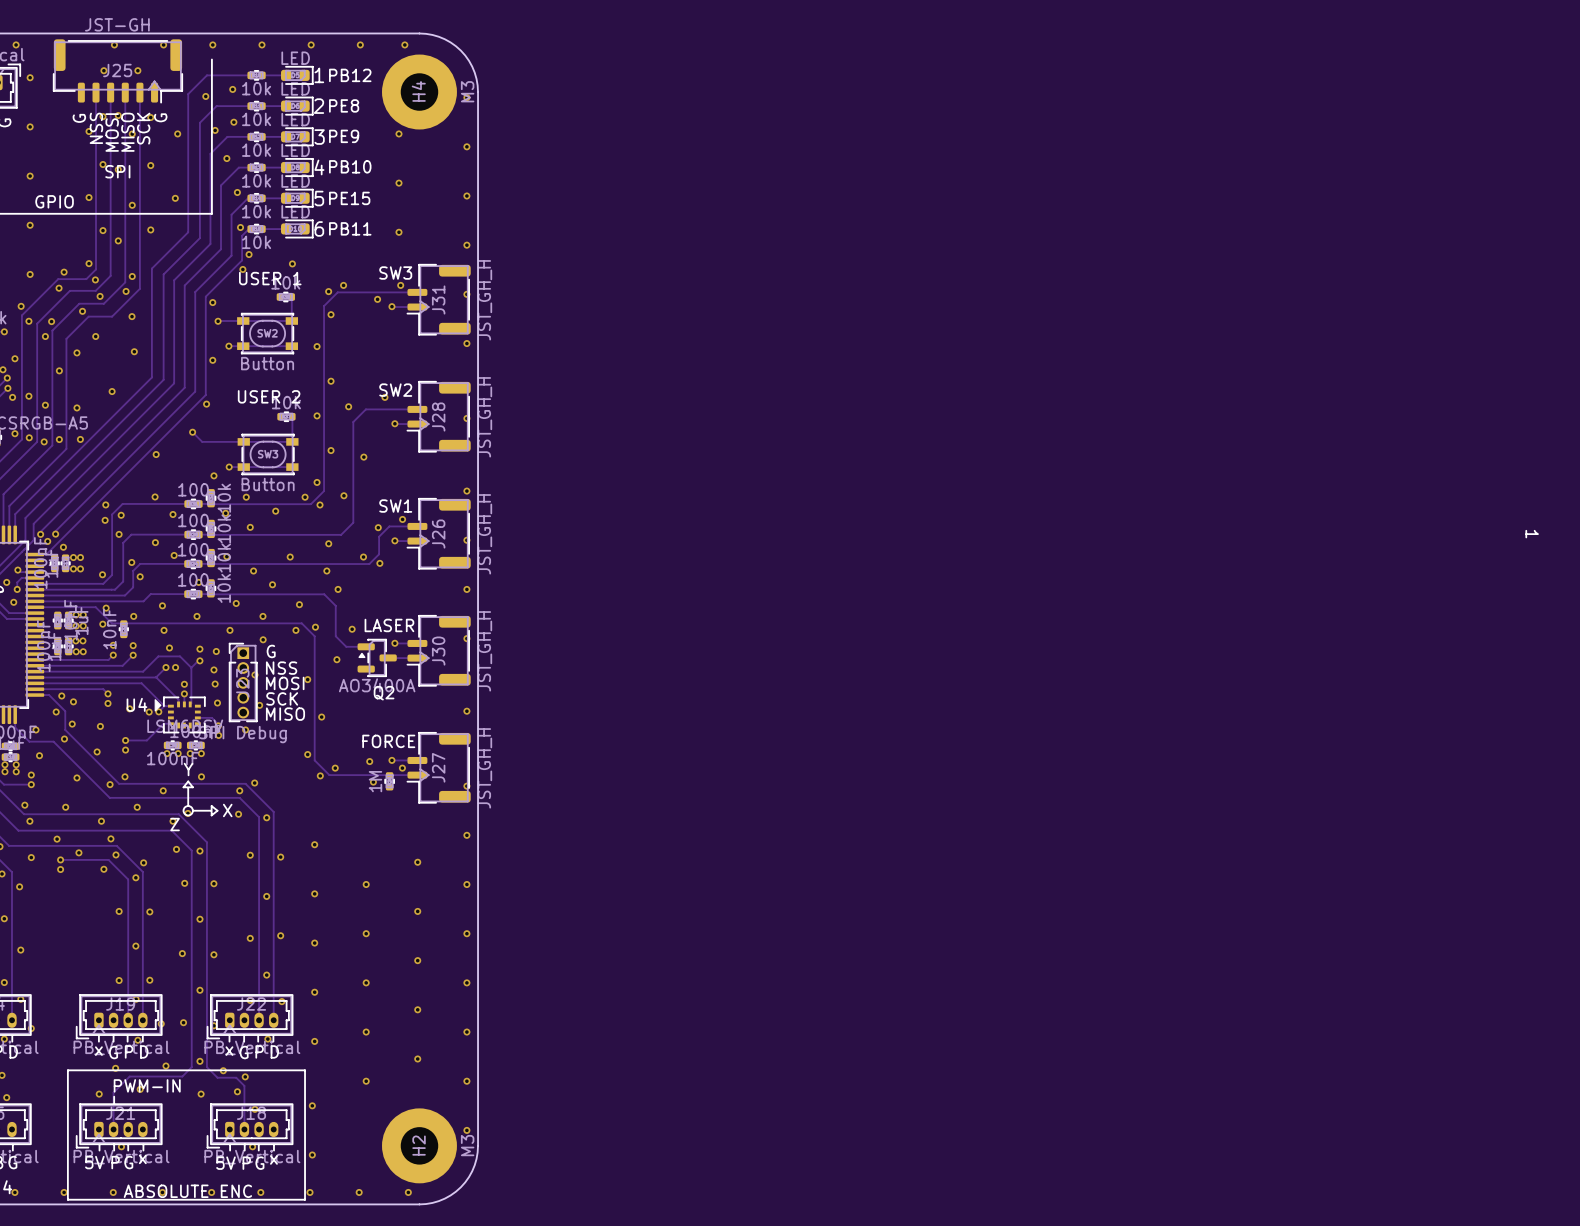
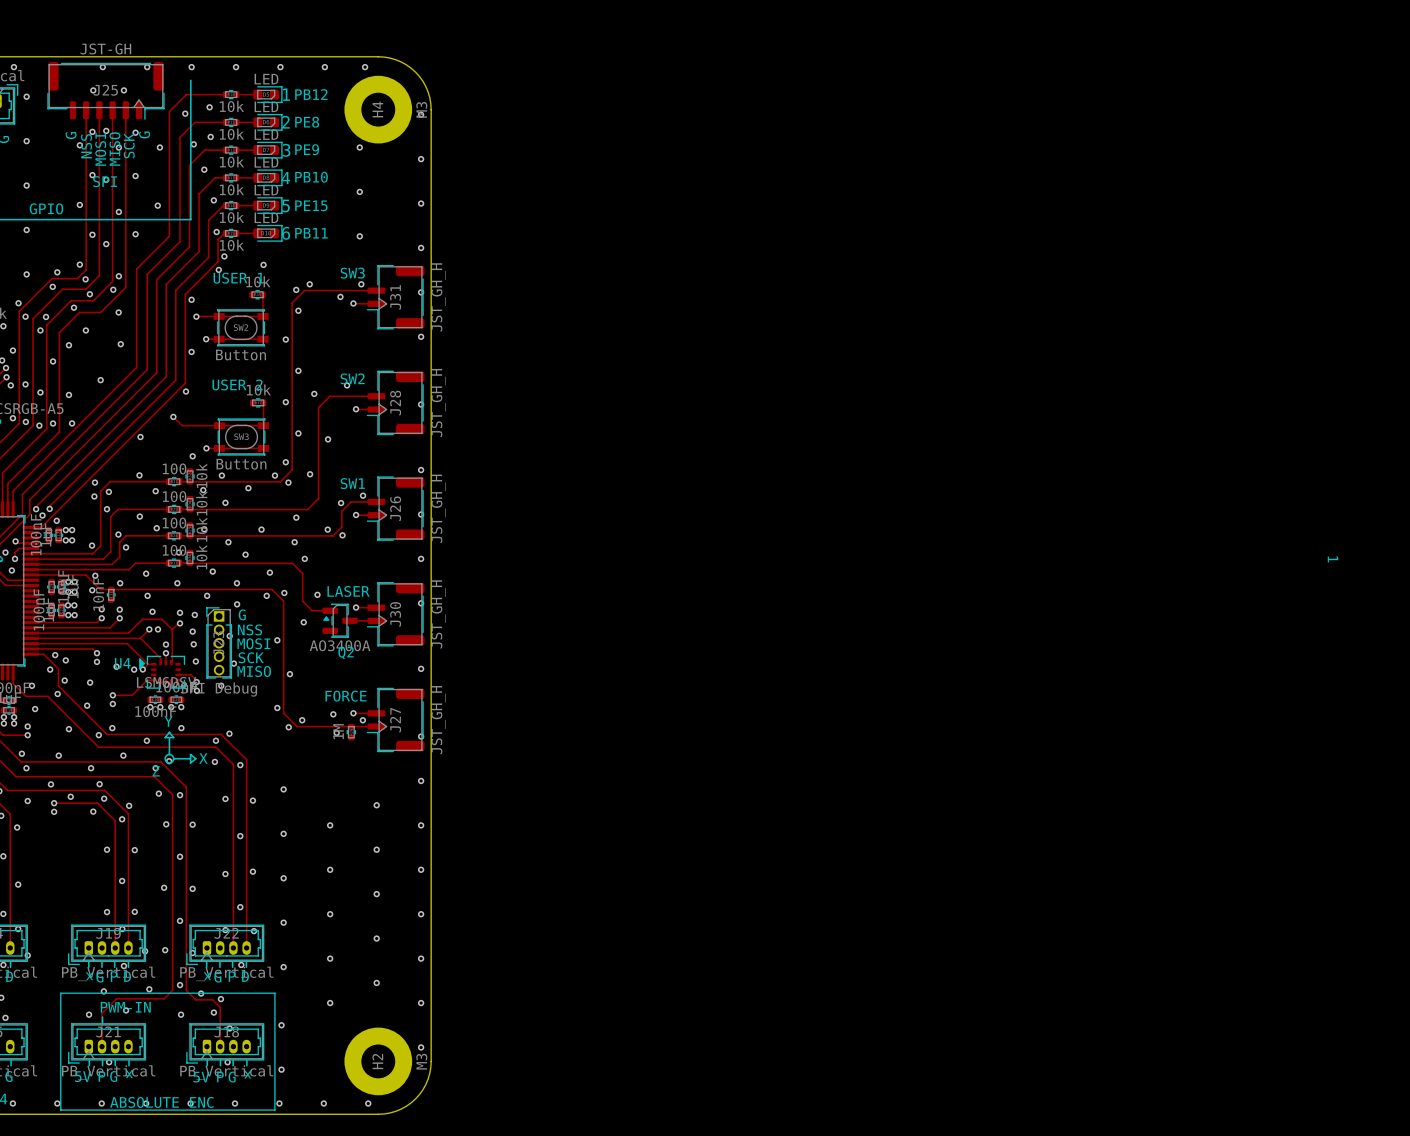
text position: 1 (1532, 534) -> 1 (1333, 559)

